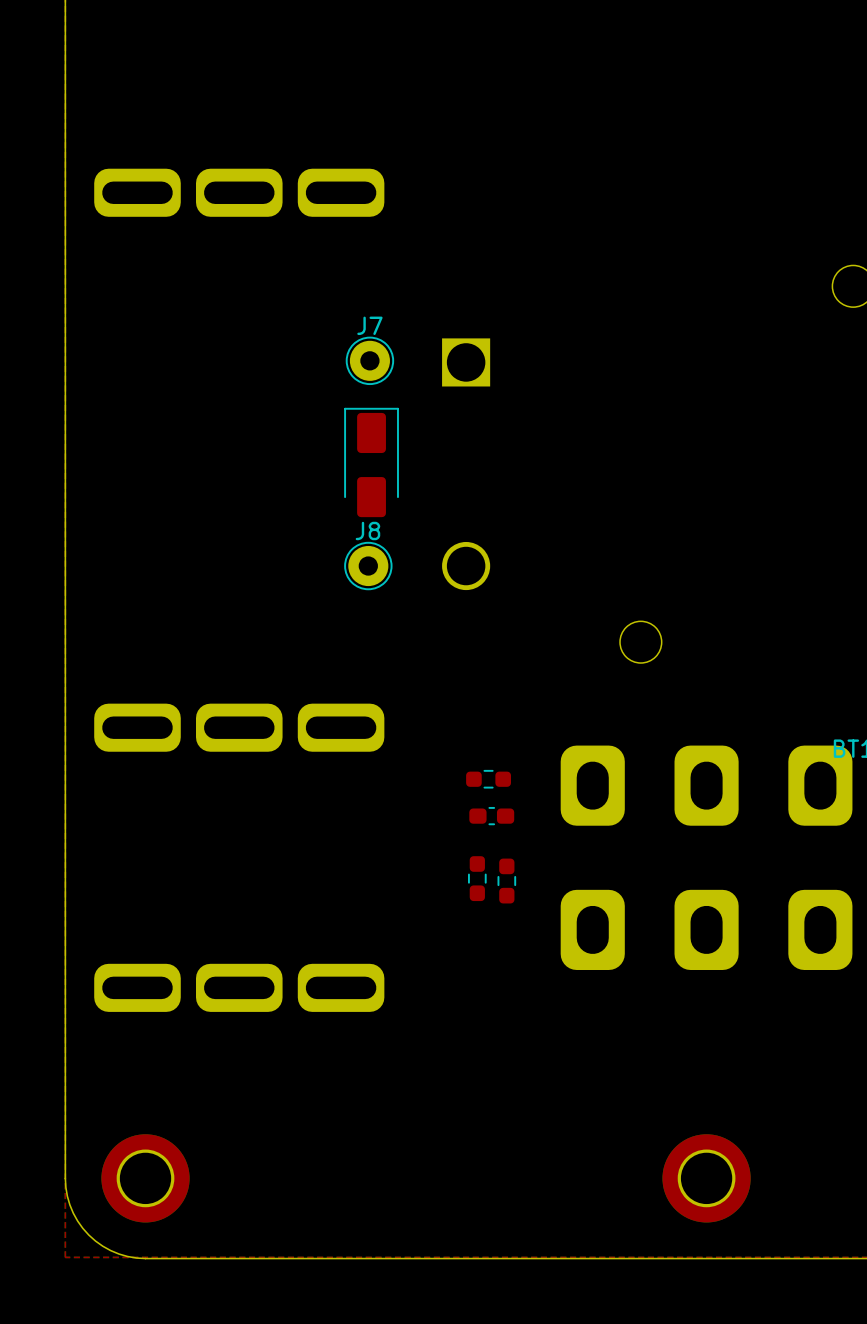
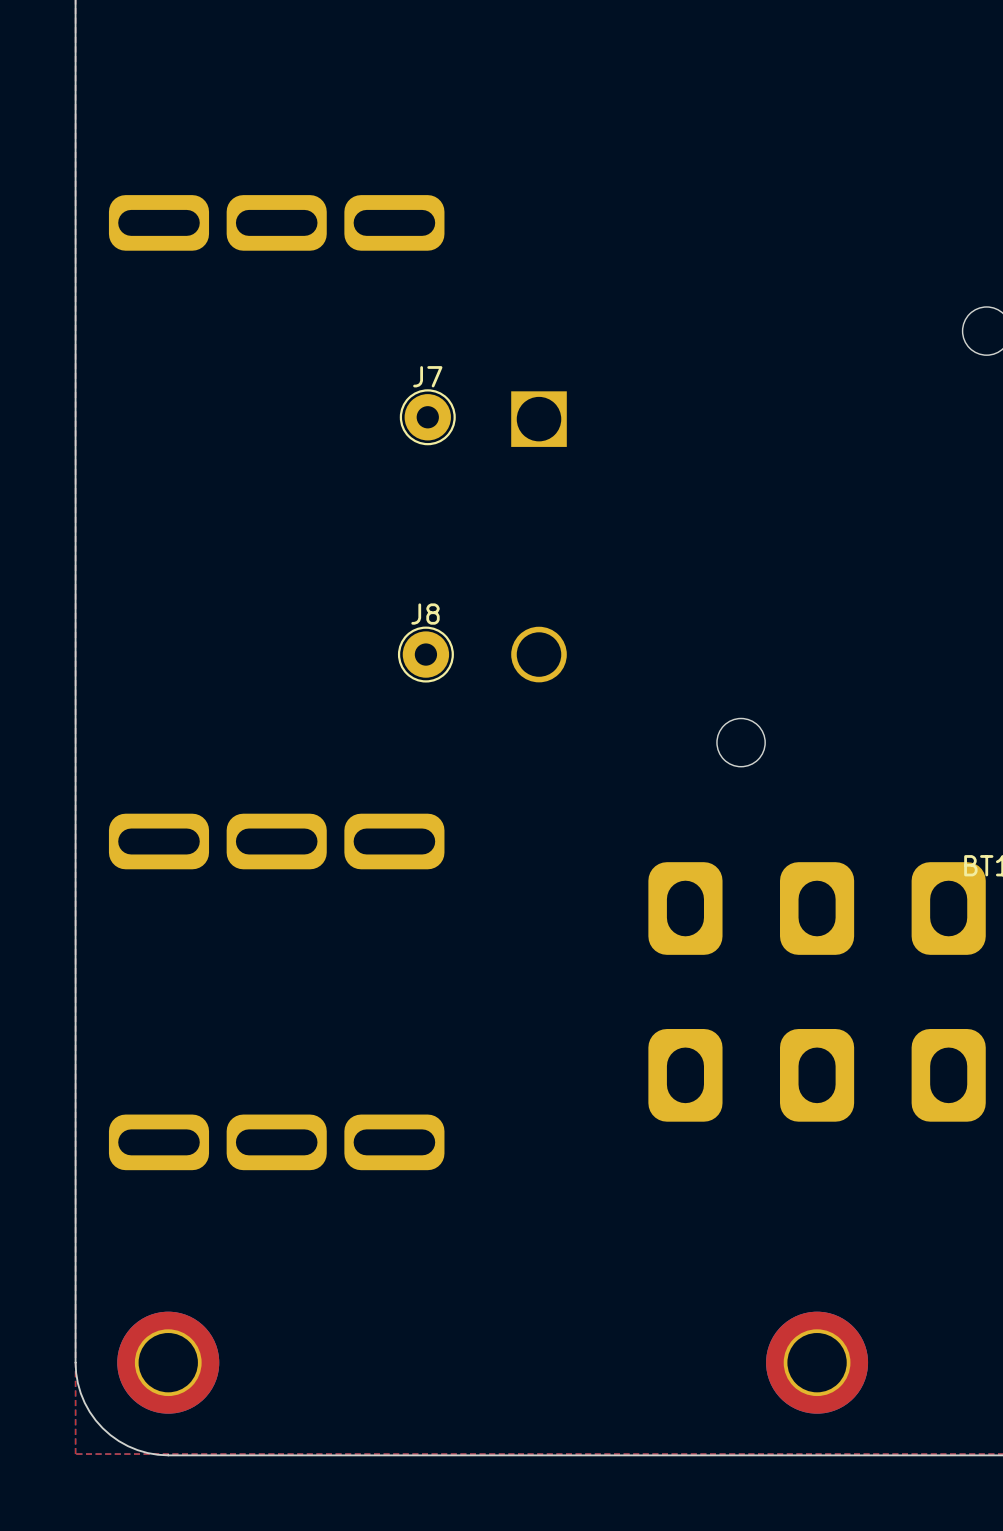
part: (371, 462) -> none
part: (488, 779) -> none
part: (491, 816) -> none
part: (477, 878) -> none
part: (506, 881) -> none

